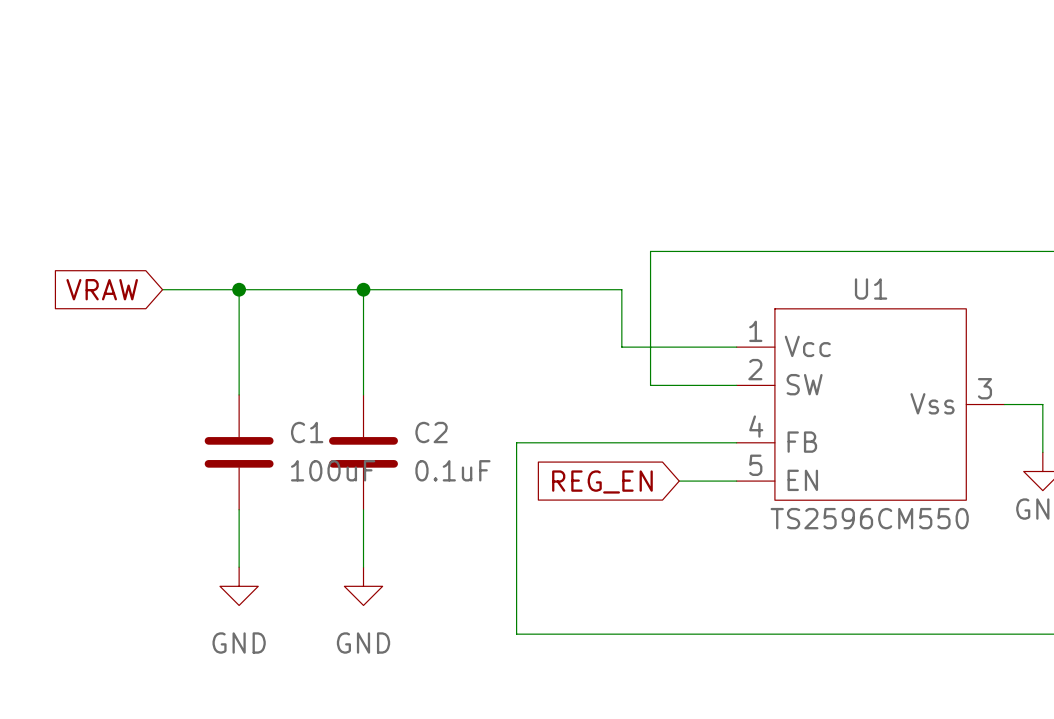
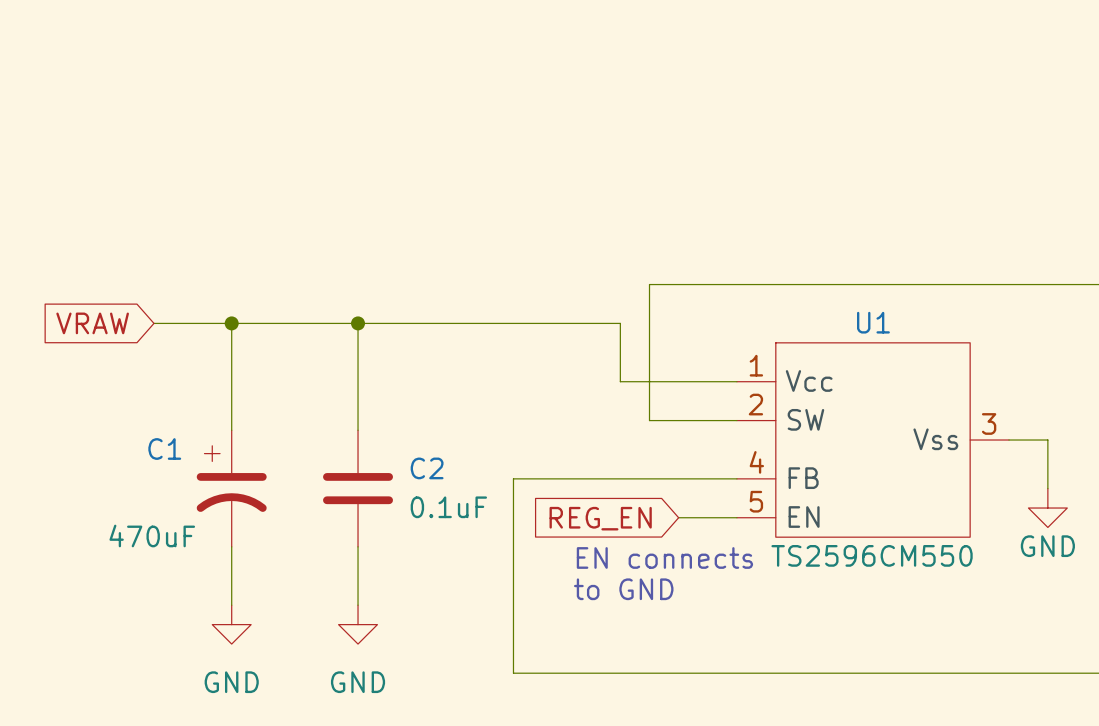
C1 symbol: [204, 394, 274, 510] -> [196, 430, 267, 547]
C1 name position: C1 (307, 432) -> C1 (164, 449)
C1 value: 100uF (333, 470) -> 470uF (152, 535)
text: none -> EN connects (664, 557)
text: none -> to GND (623, 589)

